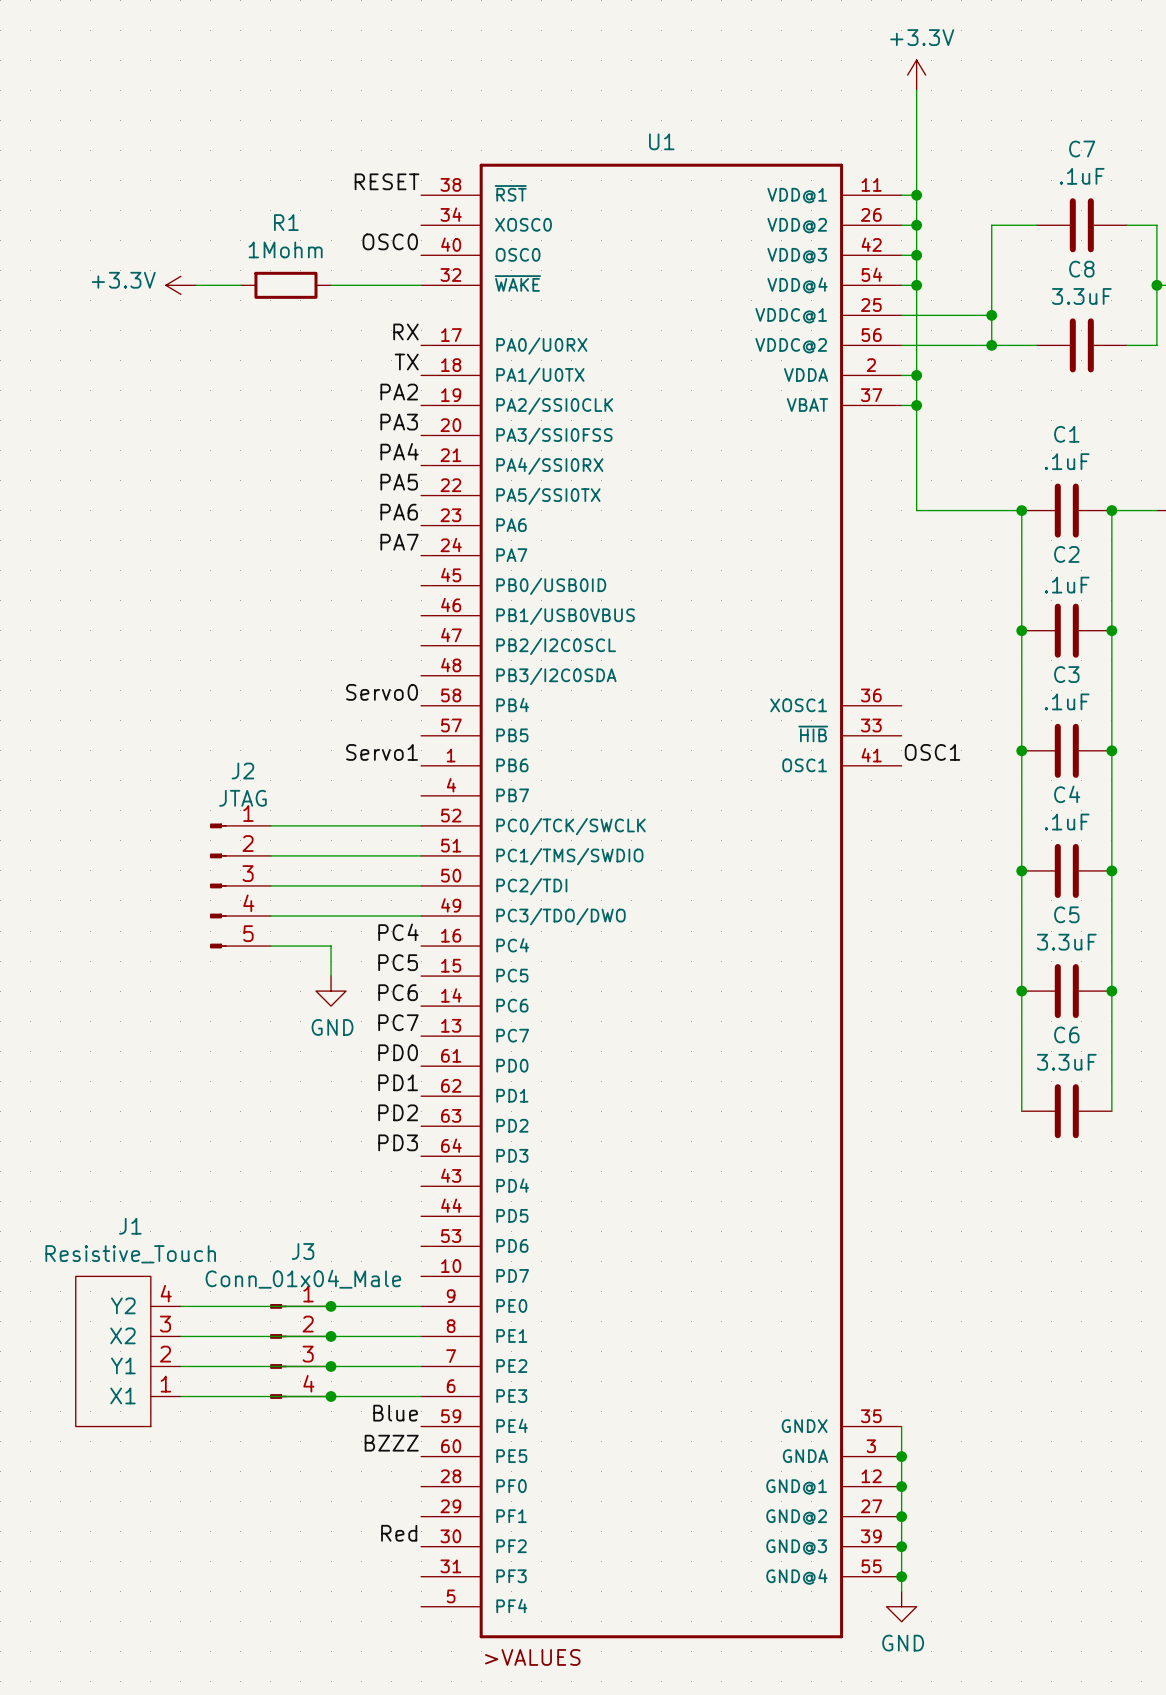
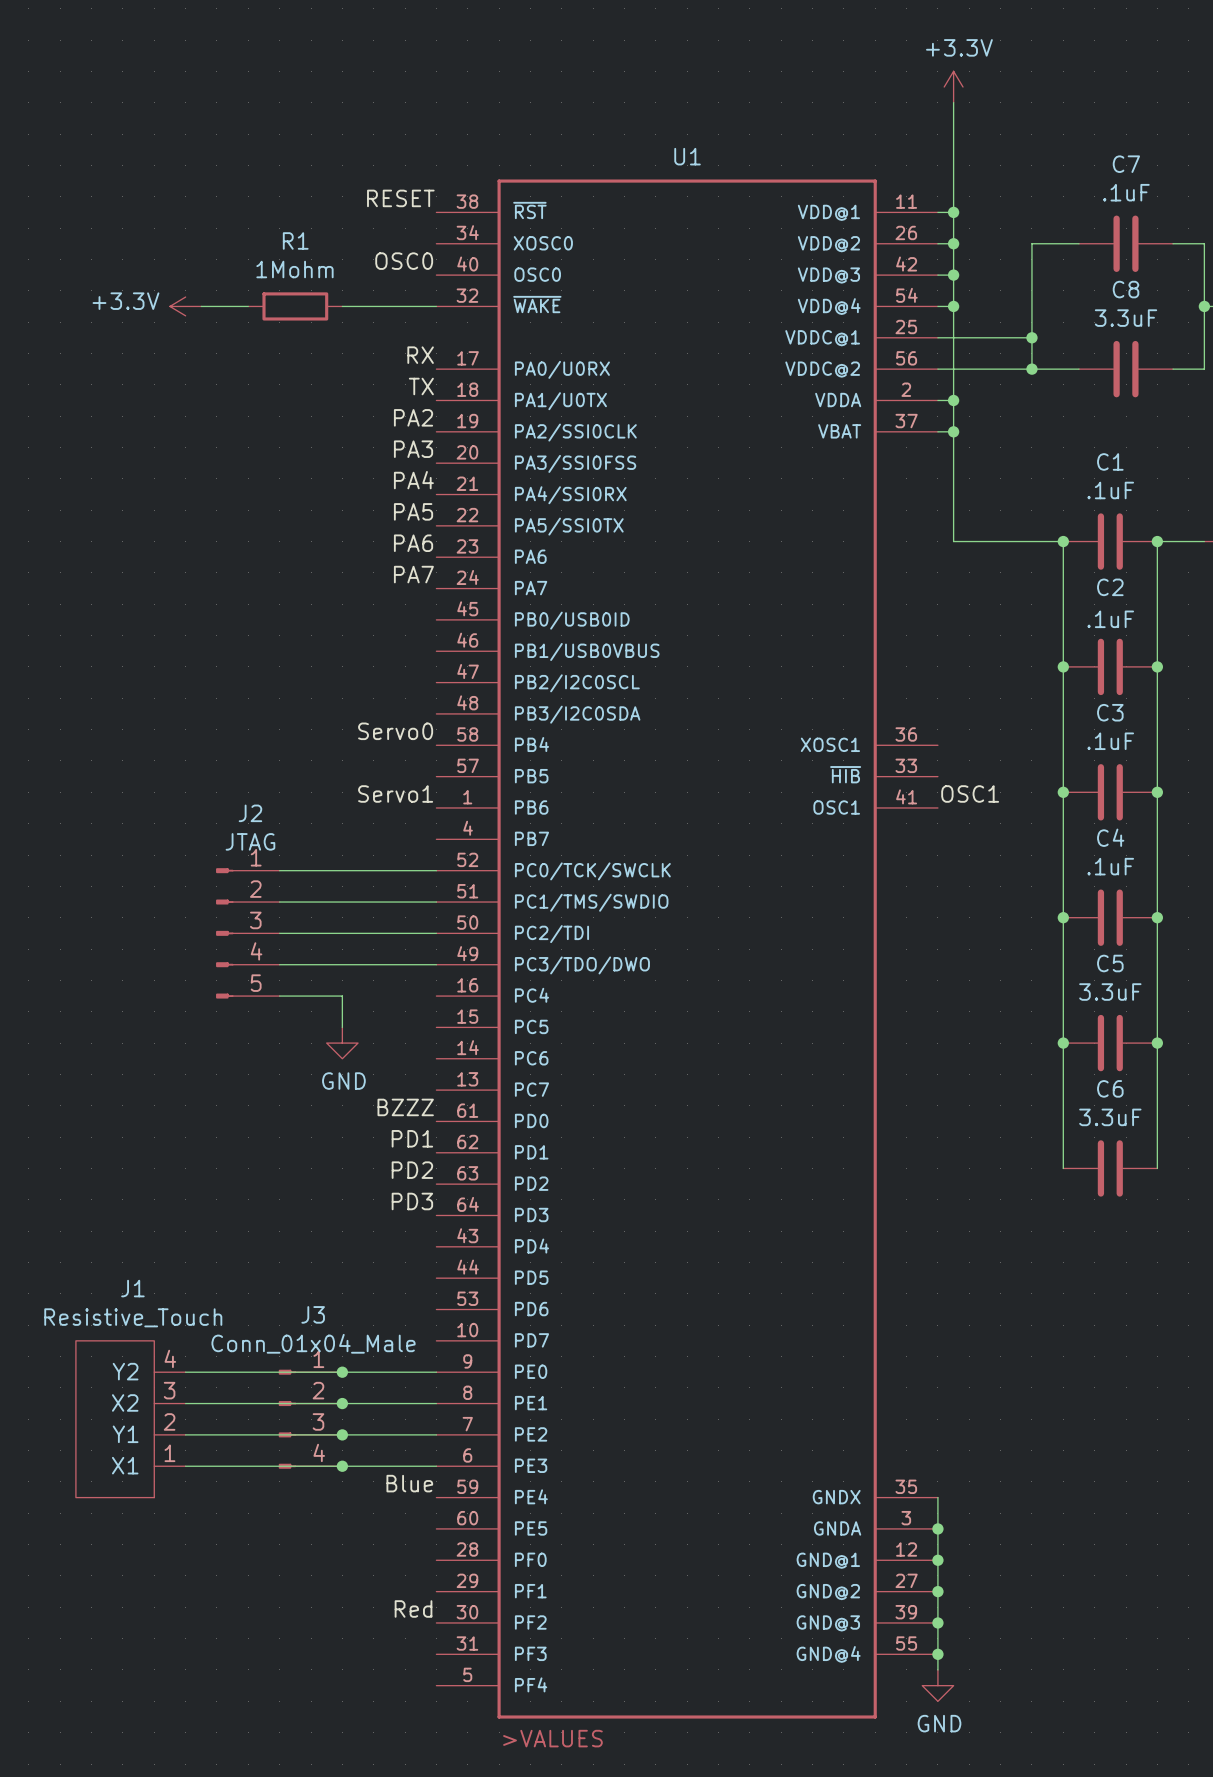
label: PC4 (398, 932) -> none
label: PC5 (398, 962) -> none
label: PC6 (398, 992) -> none
label: PC7 (398, 1022) -> none
label: PD0 (398, 1052) -> BZZZ (405, 1107)
label: BZZZ (391, 1443) -> none

